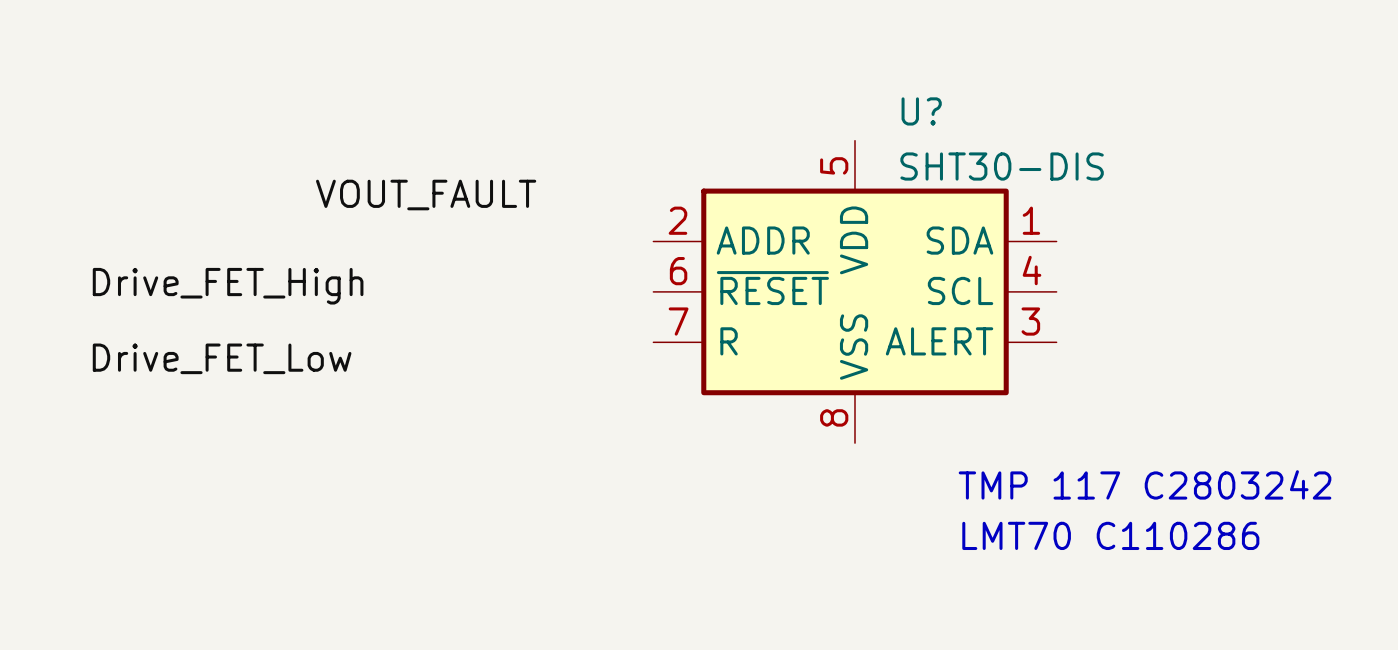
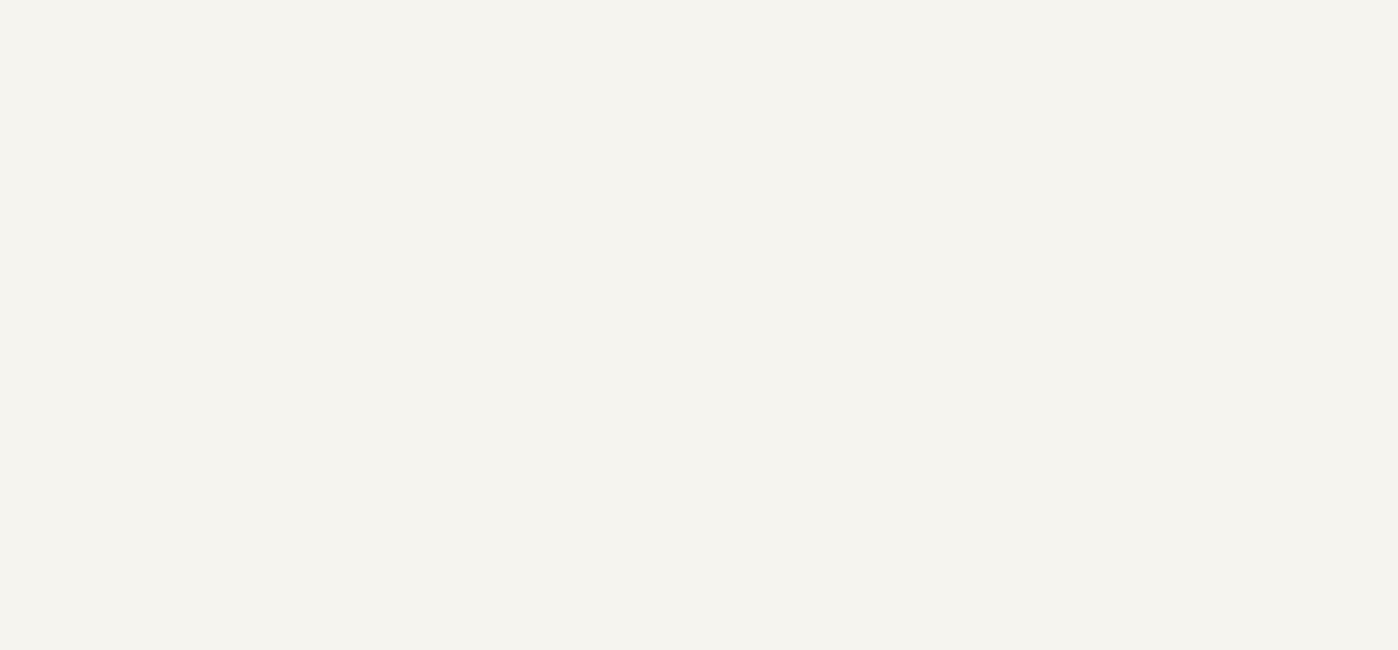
label: VOUT_FAULT (426, 195) -> none
label: Drive_FET_High (228, 286) -> none
U?: SHT30-DIS (855, 291) -> none
label: Drive_FET_Low (222, 358) -> none
text: TMP 117 C2803242 (1145, 484) -> none
text: LMT70 C110286 (1110, 535) -> none

